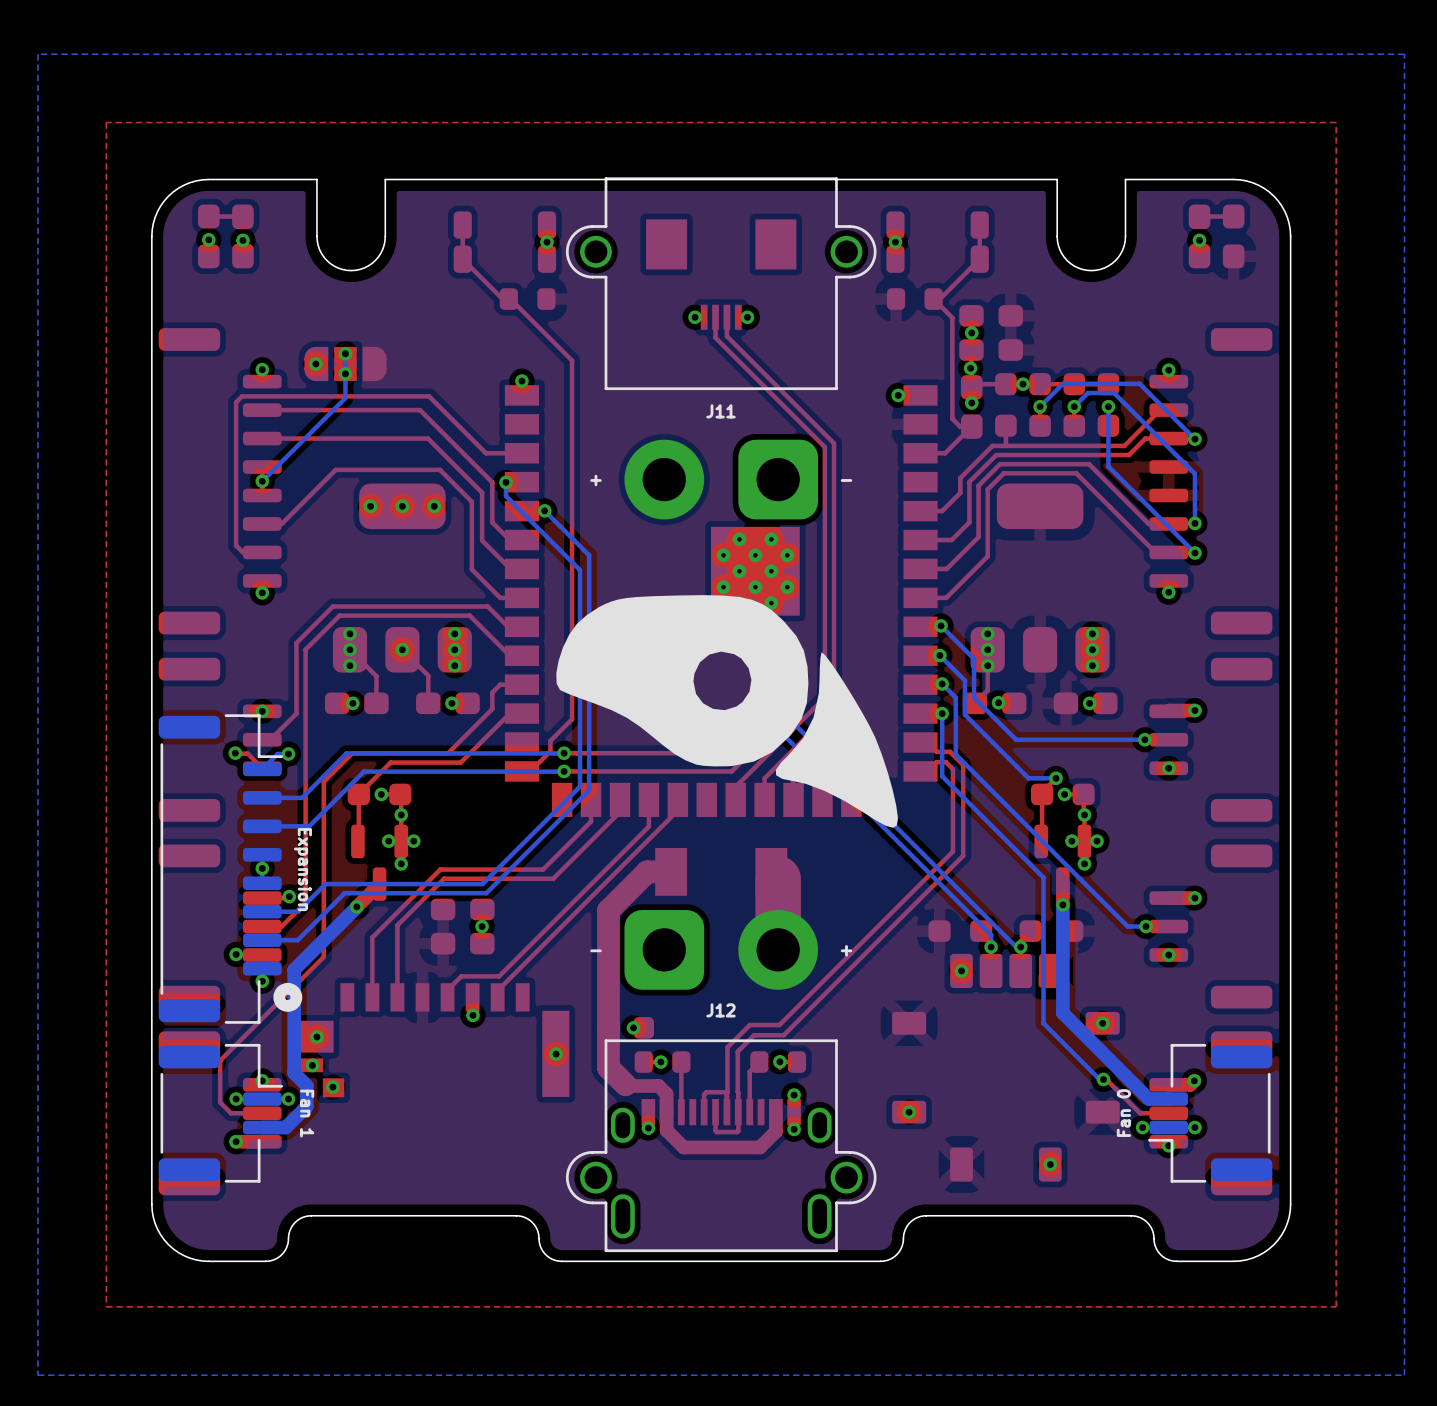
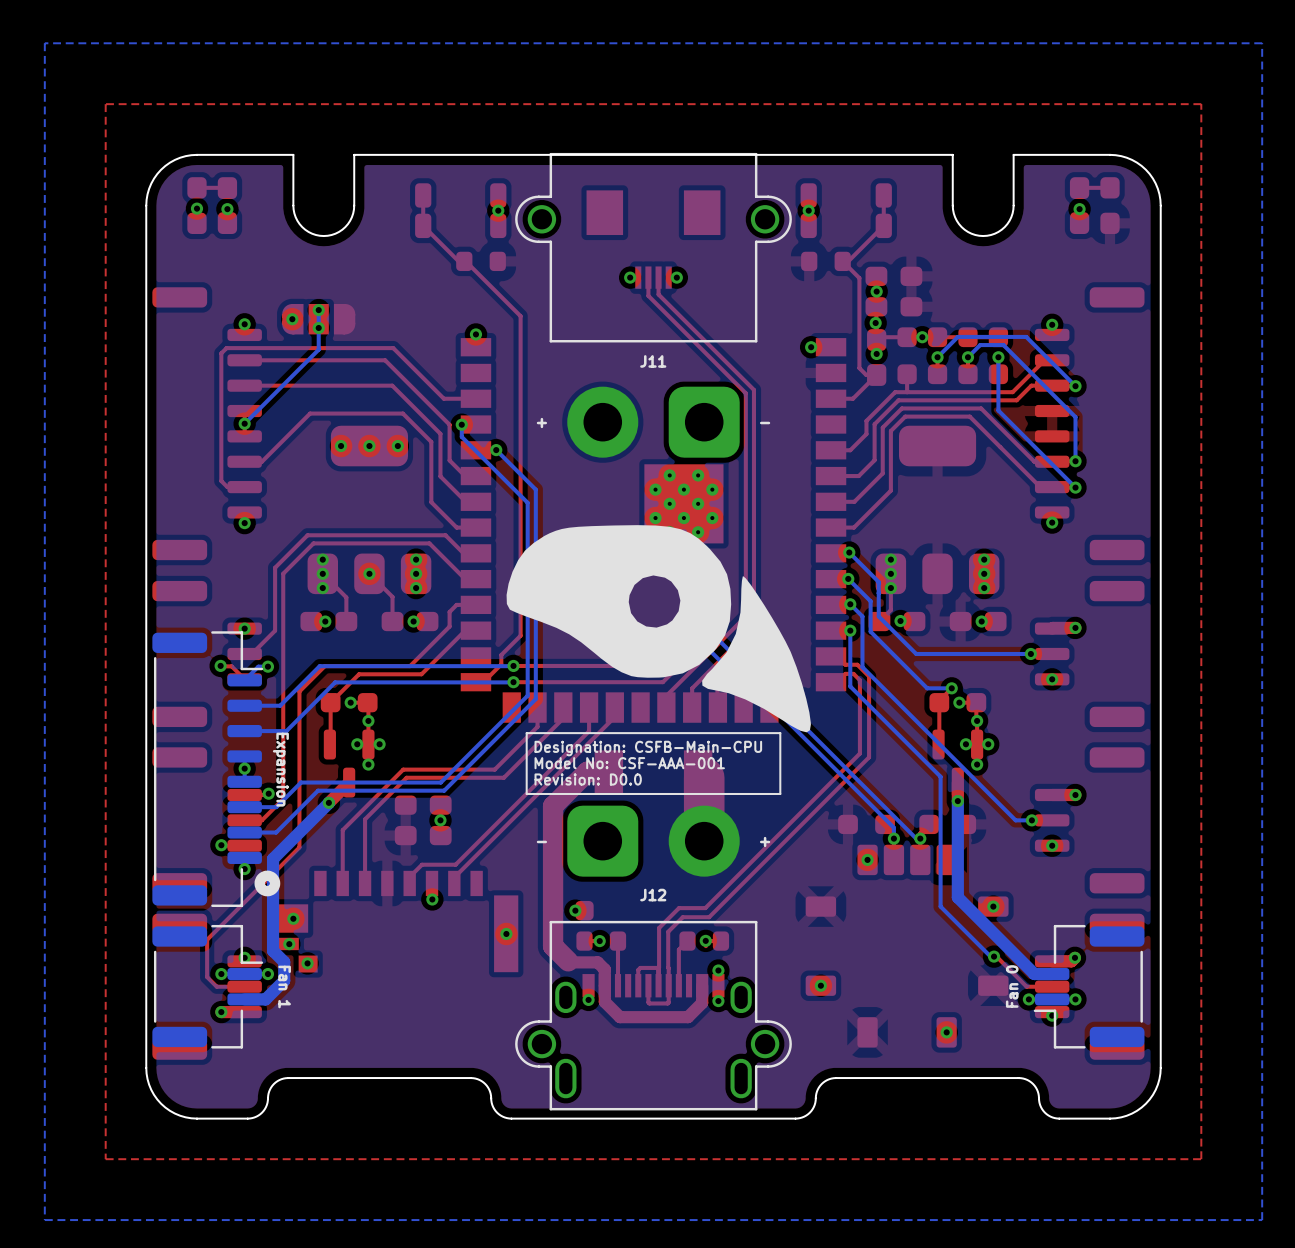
line: none -> (780, 733) (526, 733) (526, 793) (780, 793) (780, 733)
text: none -> Designation: CSFB-Main-CPU (648, 748)
text: none -> Model No: CSF-AAA-001 (629, 763)
text: none -> Revision: D0.0 (588, 779)

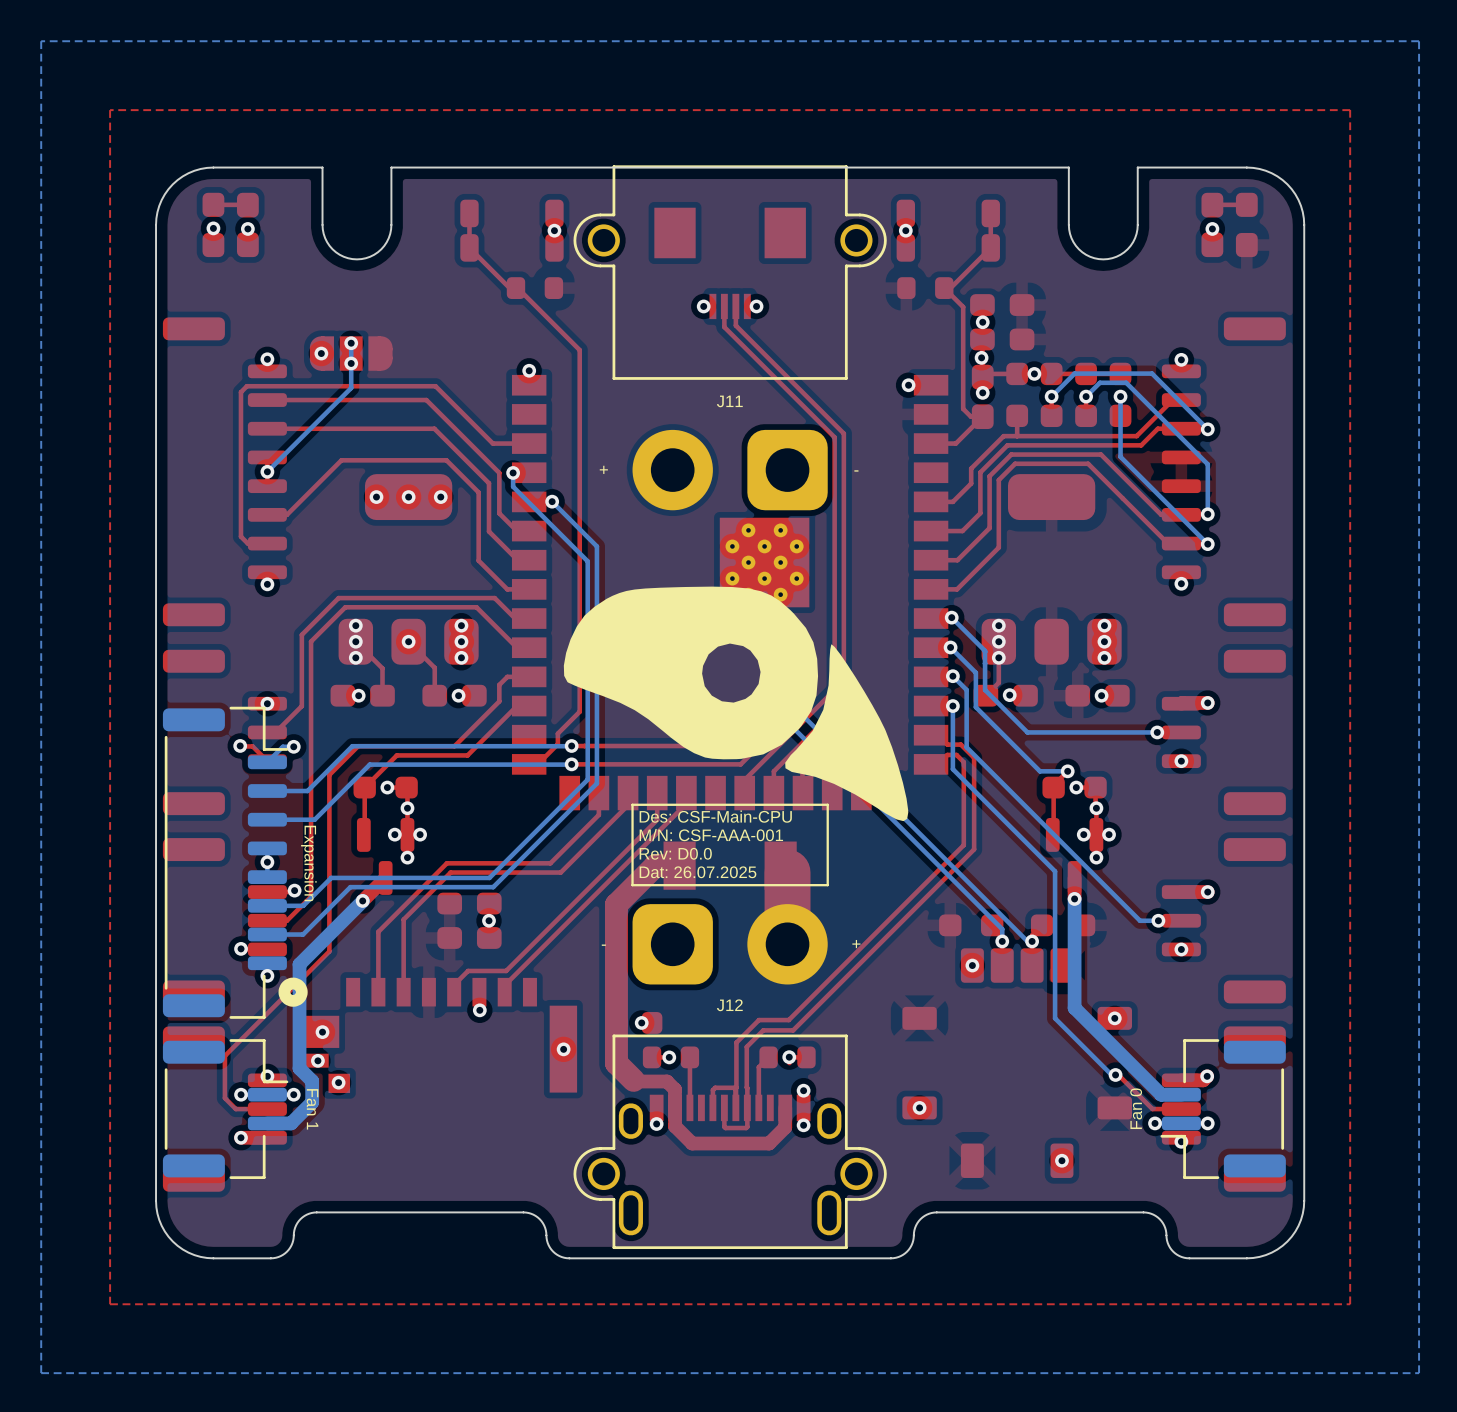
line: (780, 733) (526, 733) (526, 793) (780, 793) (780, 733) -> (827, 804) (827, 885) (632, 885) (632, 804) (827, 804)
text: Designation: CSFB-Main-CPU (648, 748) -> Des: CSF-Main-CPU (715, 816)
text: Model No: CSF-AAA-001 (629, 763) -> M/N: CSF-AAA-001 (711, 835)
text: none -> Dat: 26.07.2025 (697, 872)
text: Revision: D0.0 (588, 779) -> Rev: D0.0 (675, 853)

